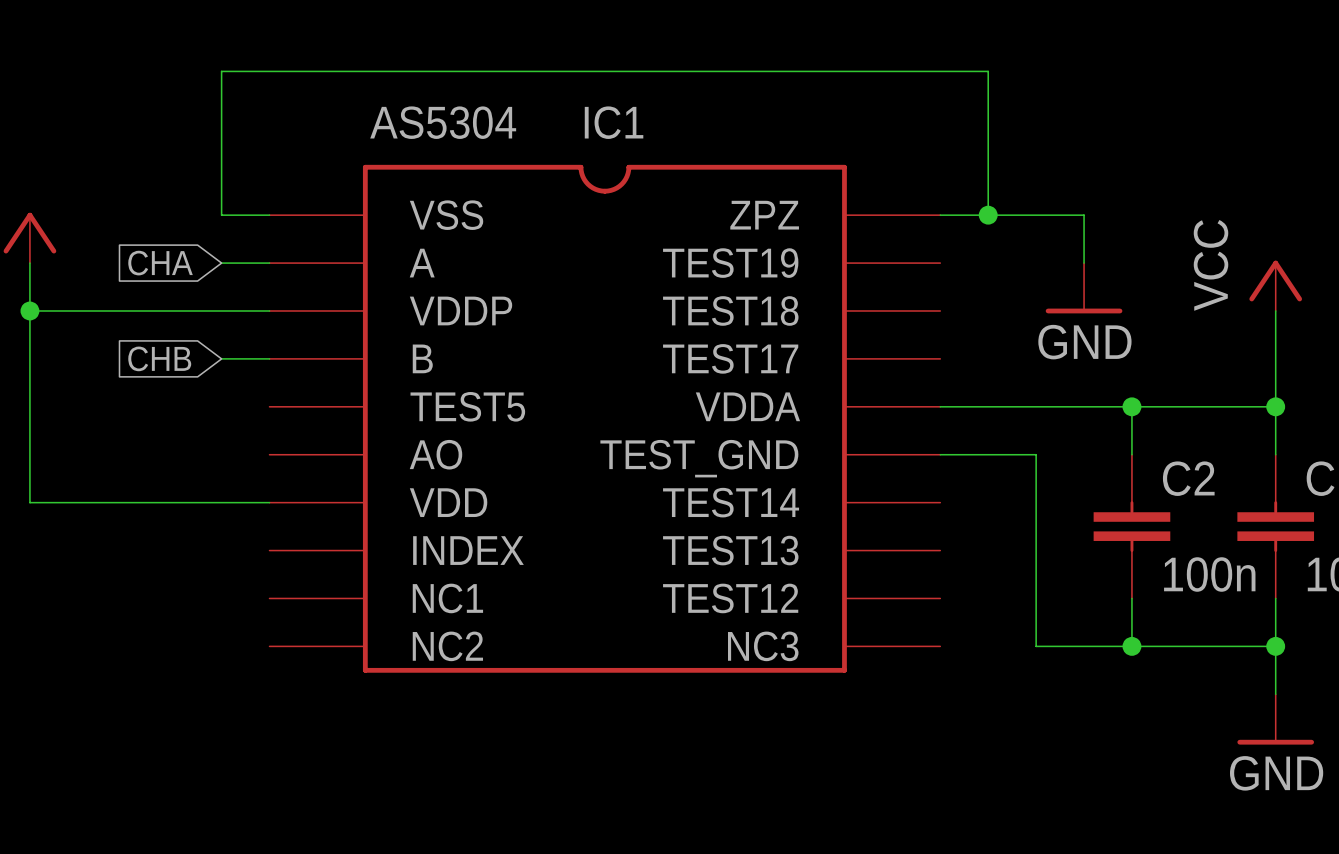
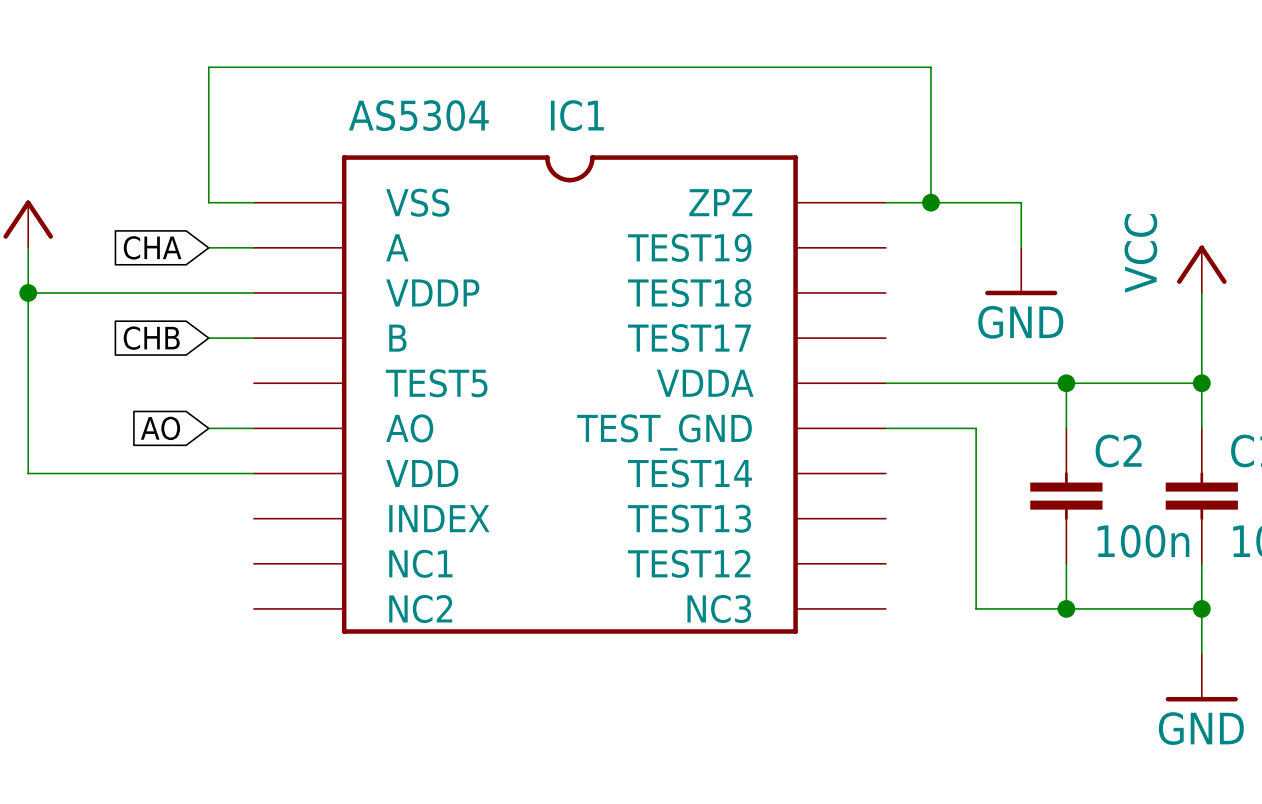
global label: none -> AO (160, 428)
wire: none -> (208, 428) (253, 428)

